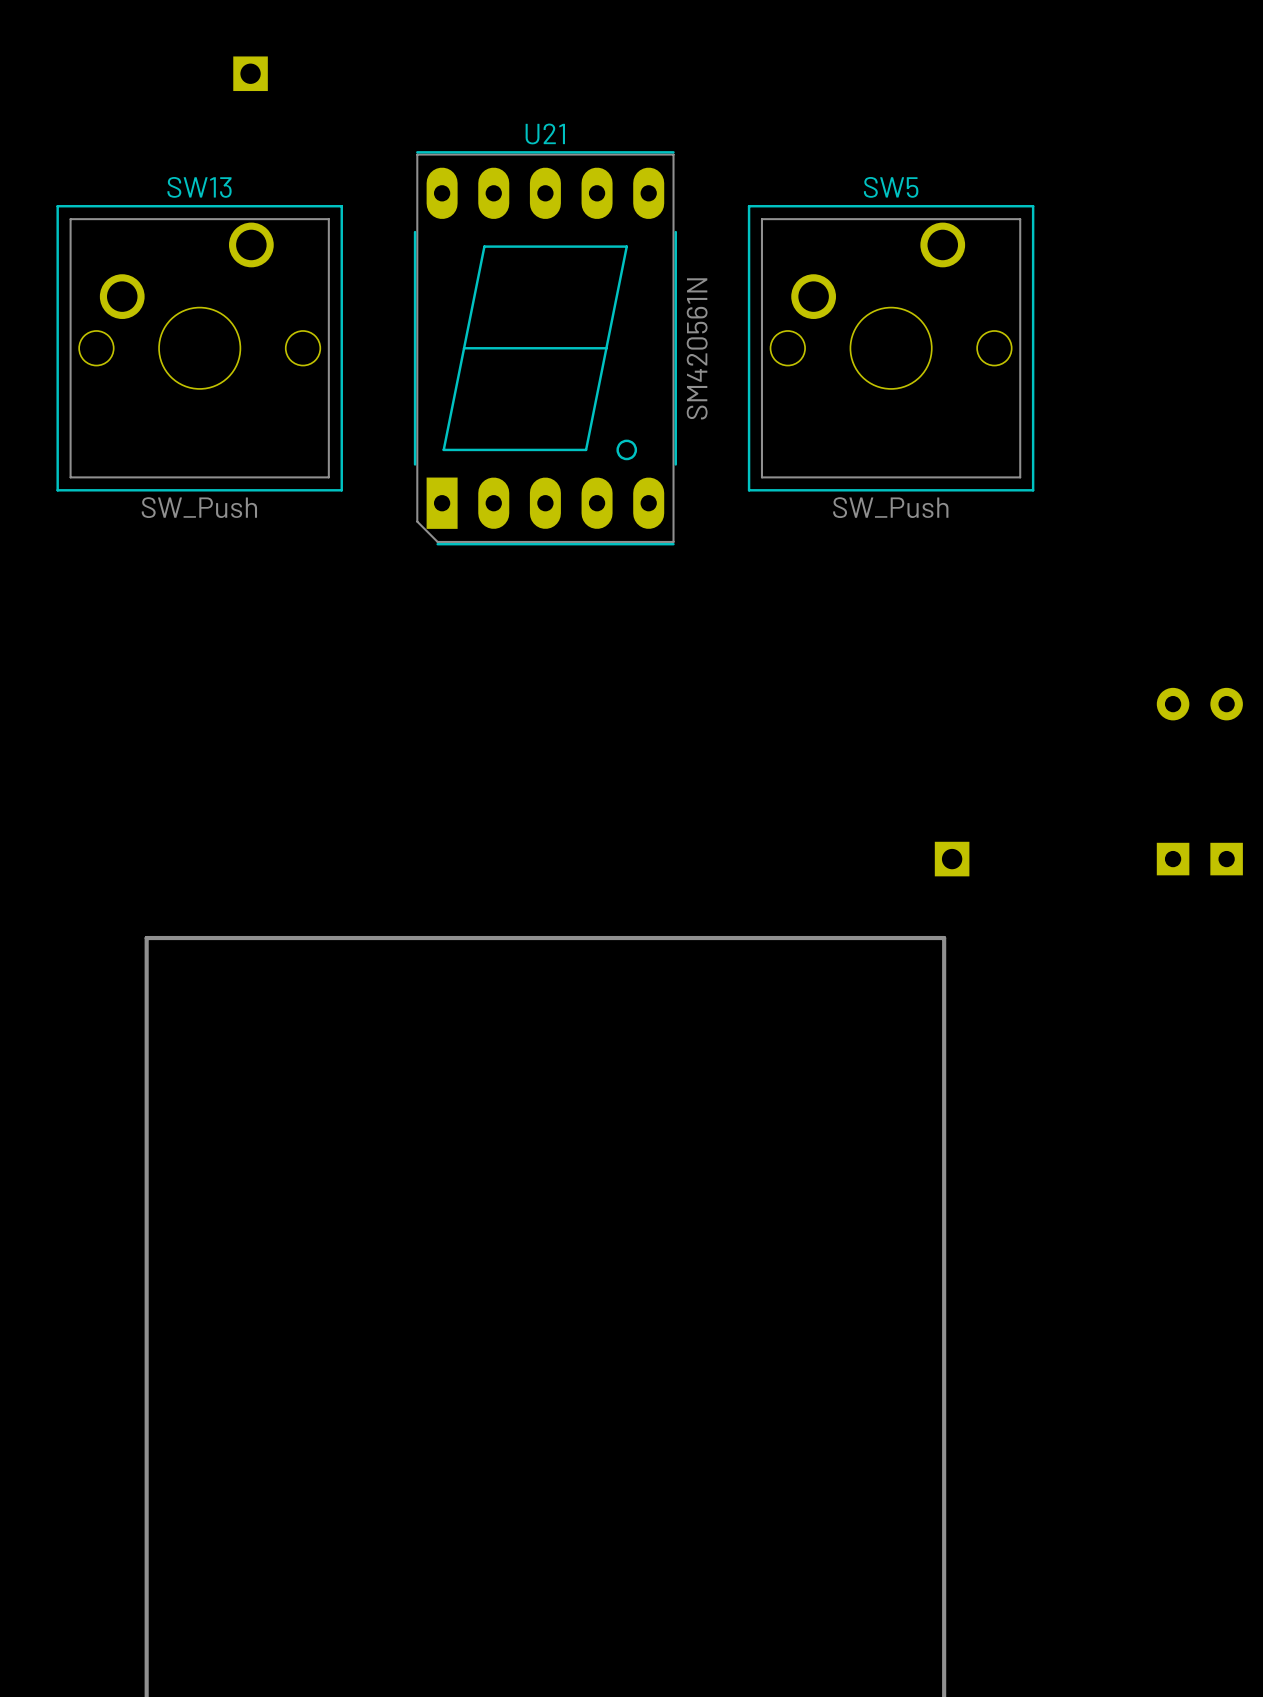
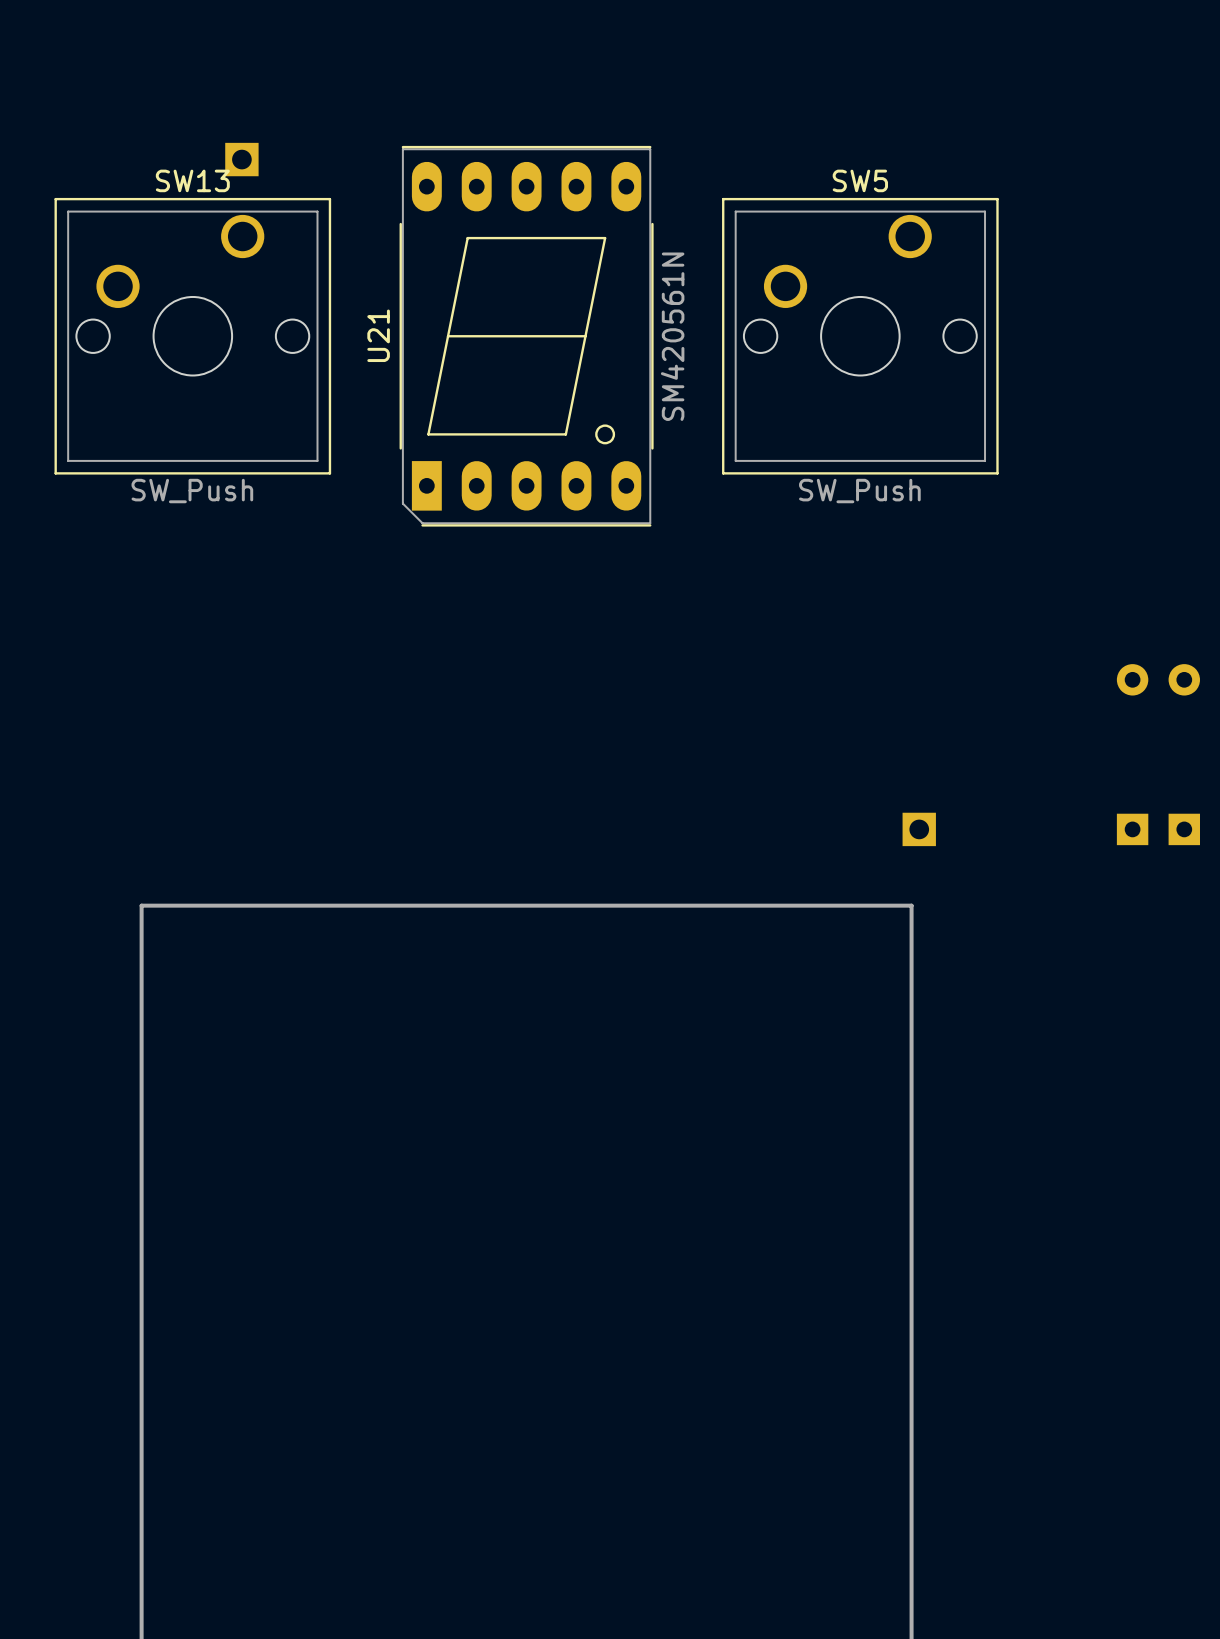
part position: (250, 73) -> (241, 159)
U21 name rotation: 0° (545, 133) -> 90° counterclockwise (378, 335)
U21 name position: U21 (545, 133) -> U21 (378, 335)

